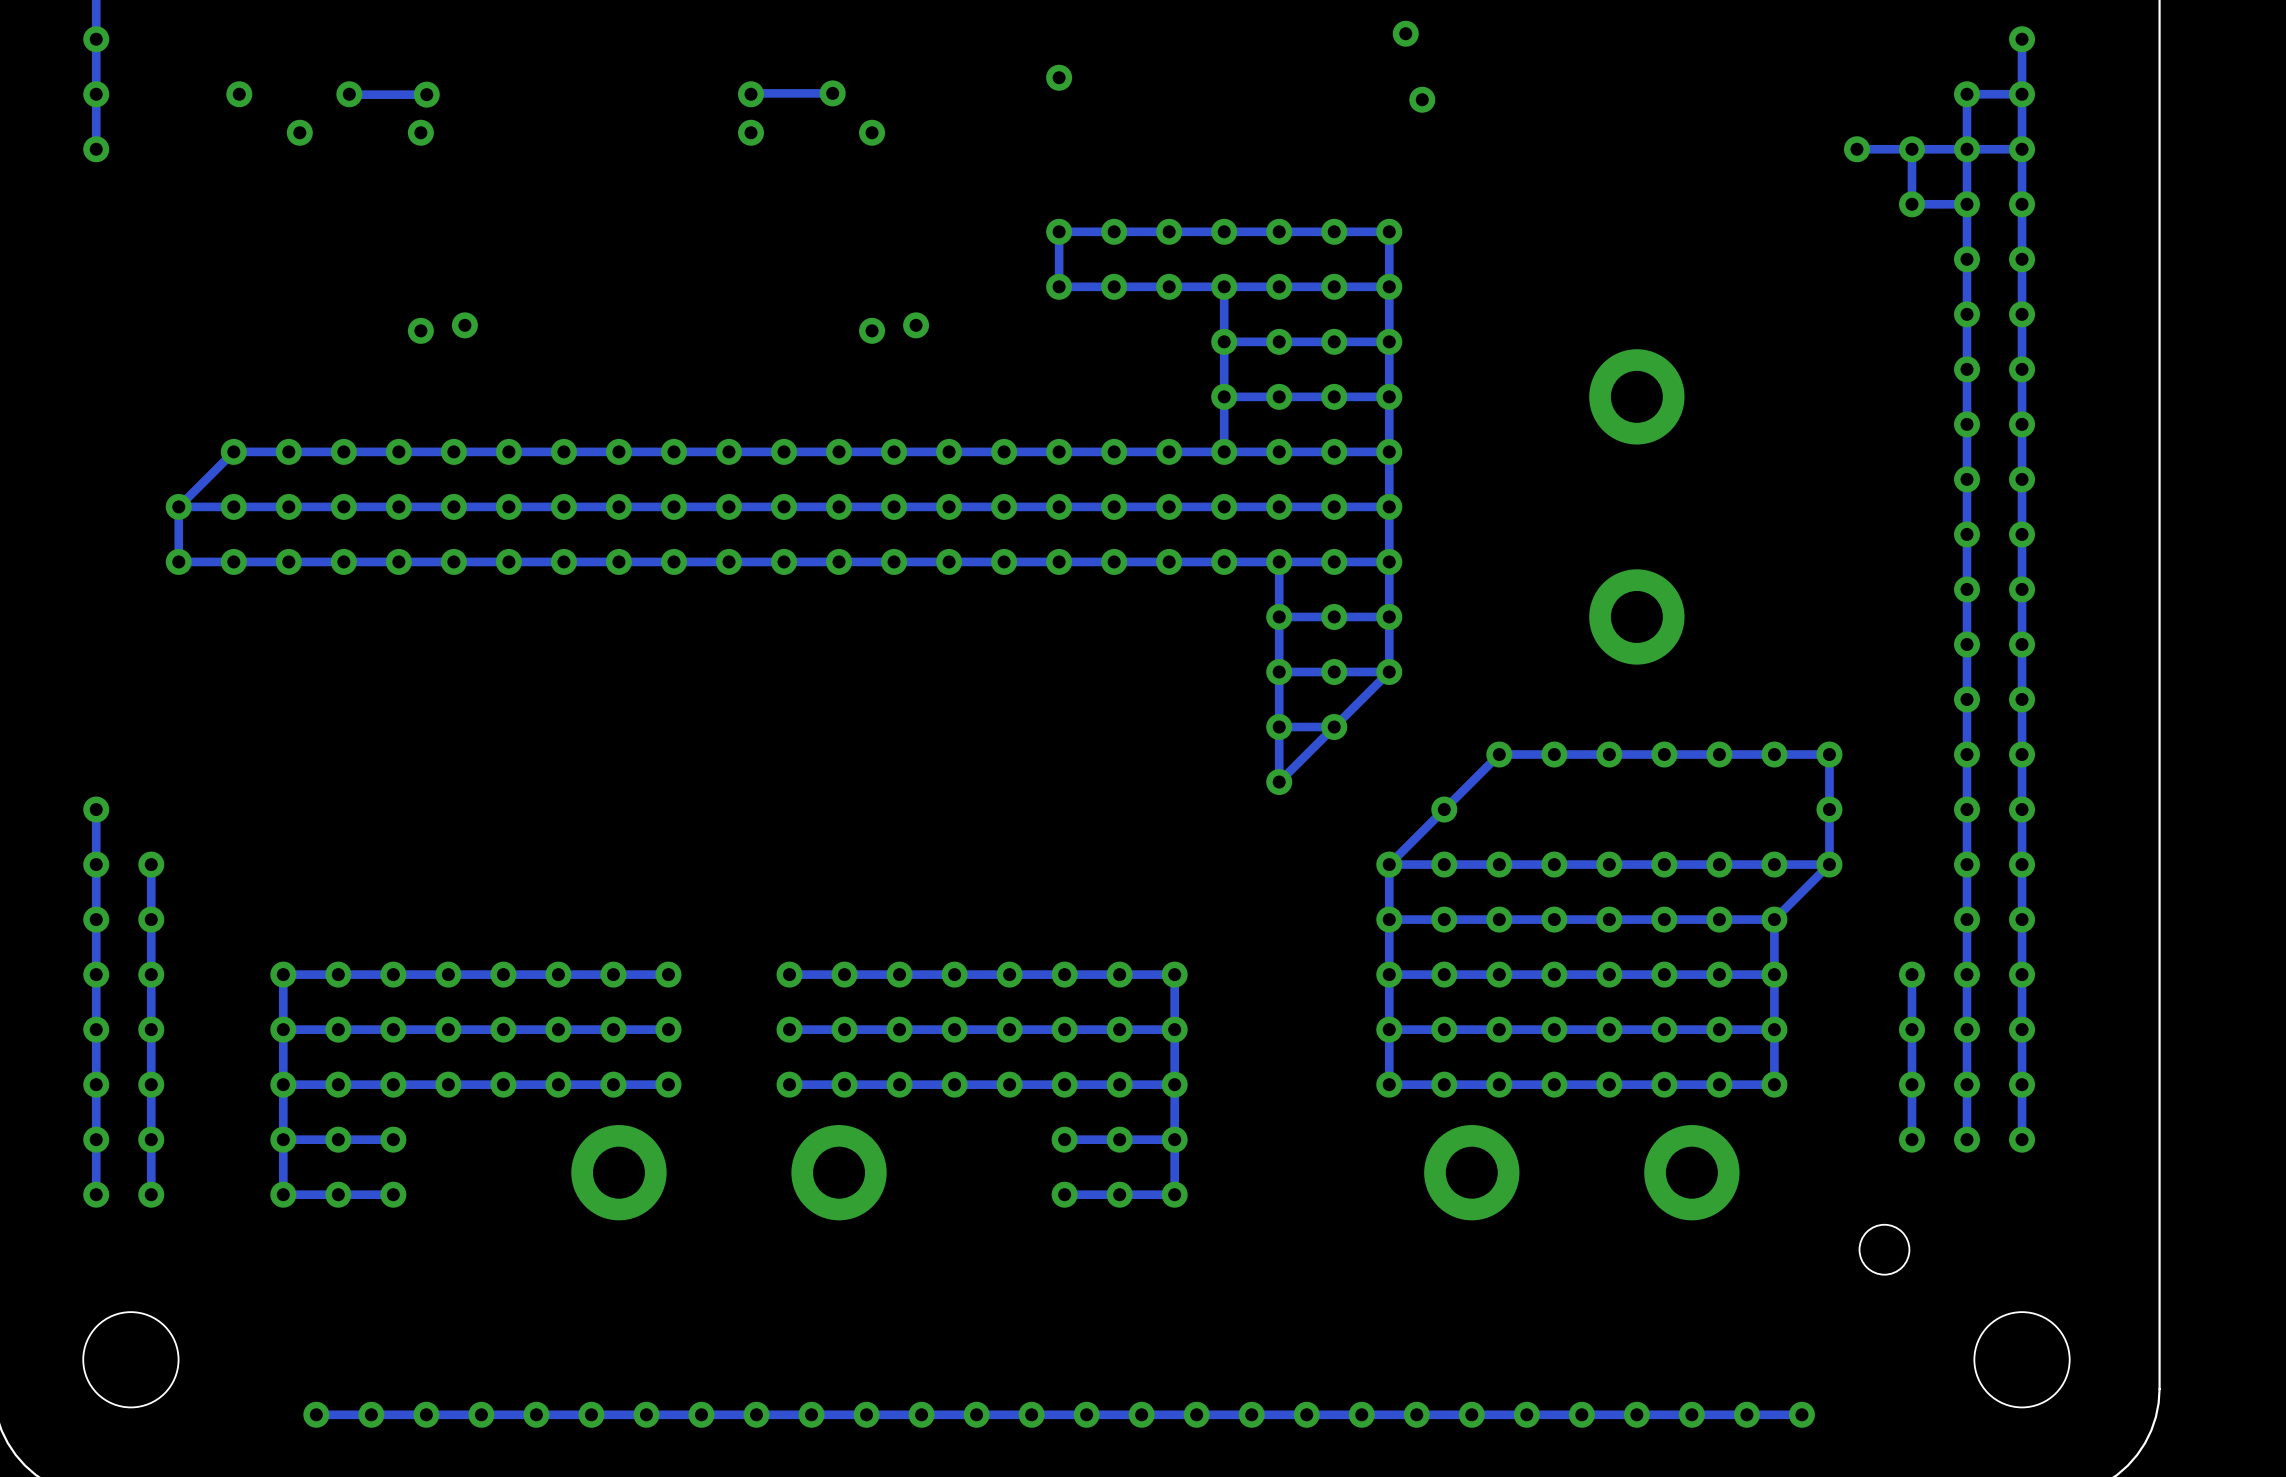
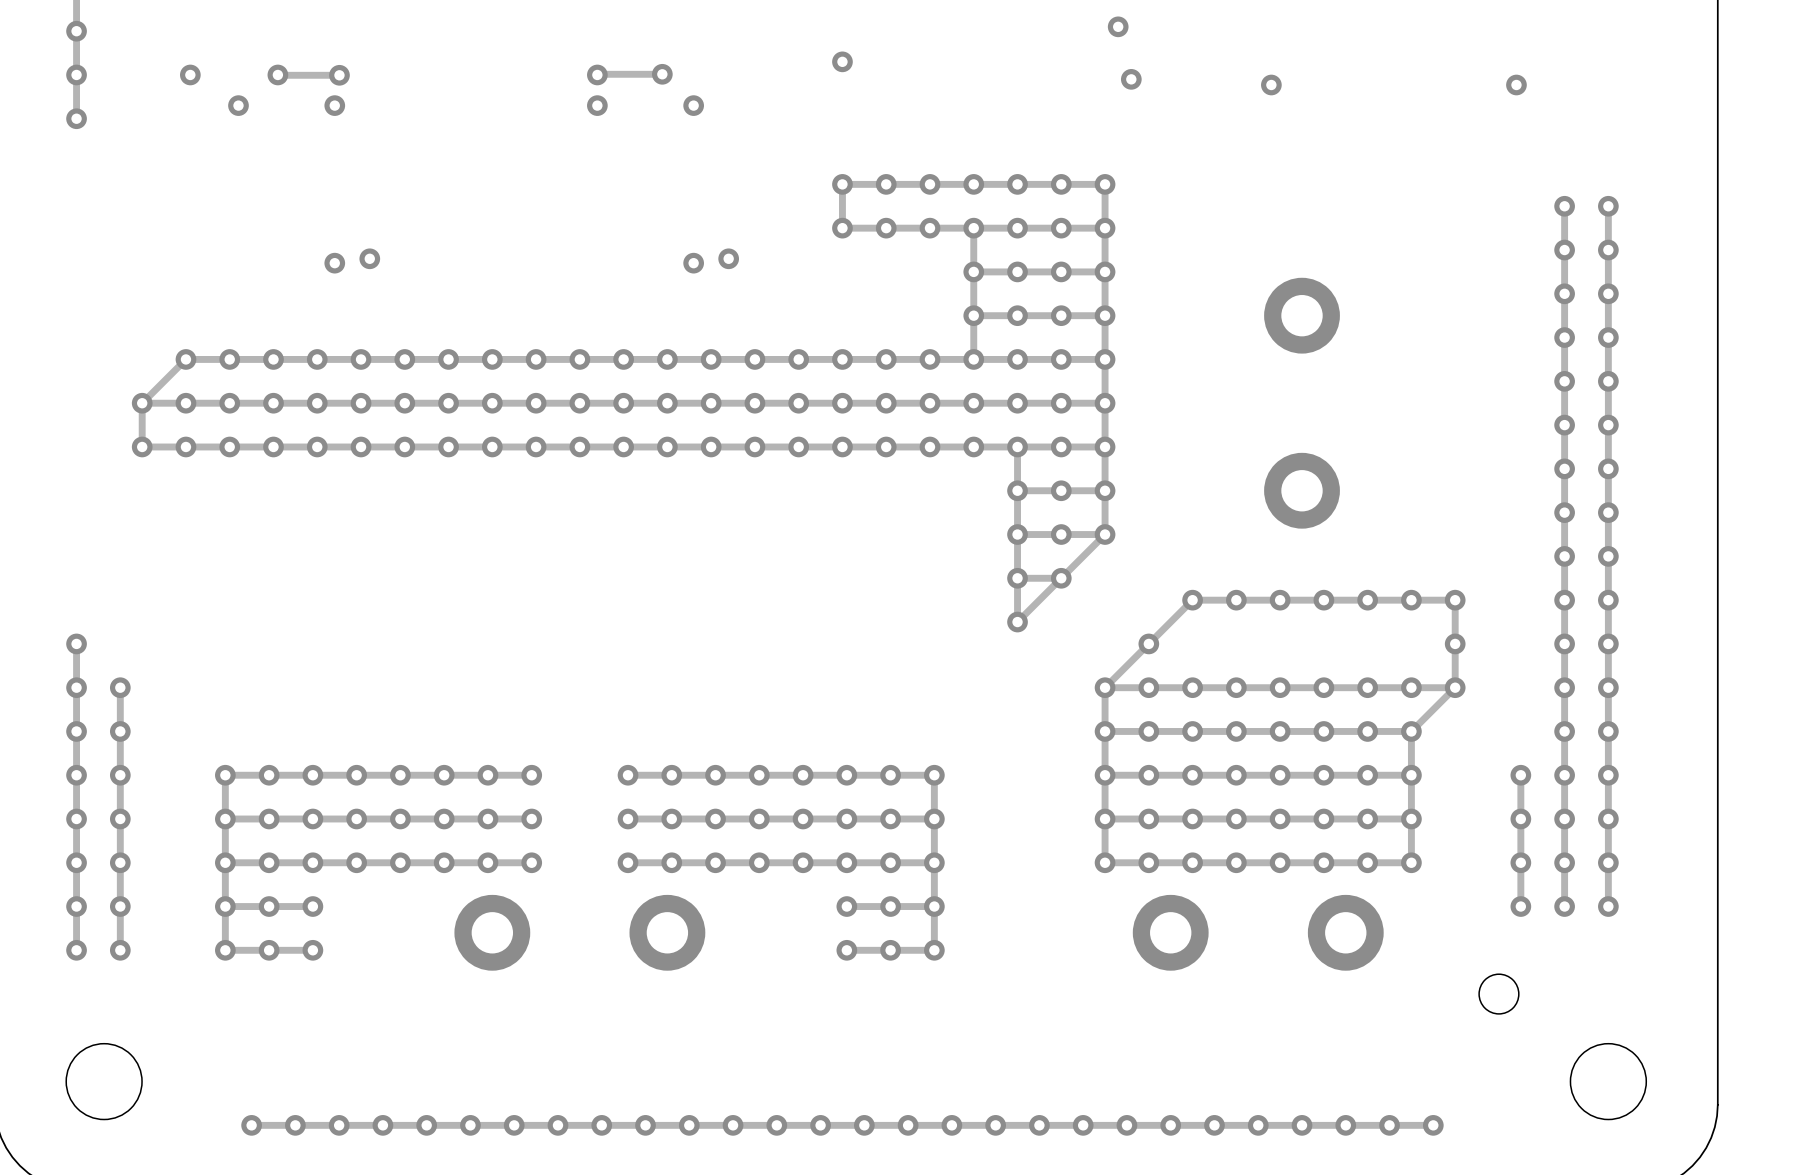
track: (2022, 39) (2022, 259) -> none
via: (2022, 39) -> none
via: (1967, 94) -> none
track: (2022, 94) (1967, 94) (1967, 259) -> none
via: (2022, 94) -> none
via: none -> (1271, 85)
via: none -> (1516, 85)
via: (1856, 149) -> none
track: (1911, 149) (1911, 204) (1967, 204) -> none
via: (1911, 149) -> none
via: (1967, 149) -> none
track: (2022, 149) (1856, 149) -> none
via: (2022, 149) -> none
via: (1911, 204) -> none
via: (1967, 204) -> none
via: (2022, 204) -> none

